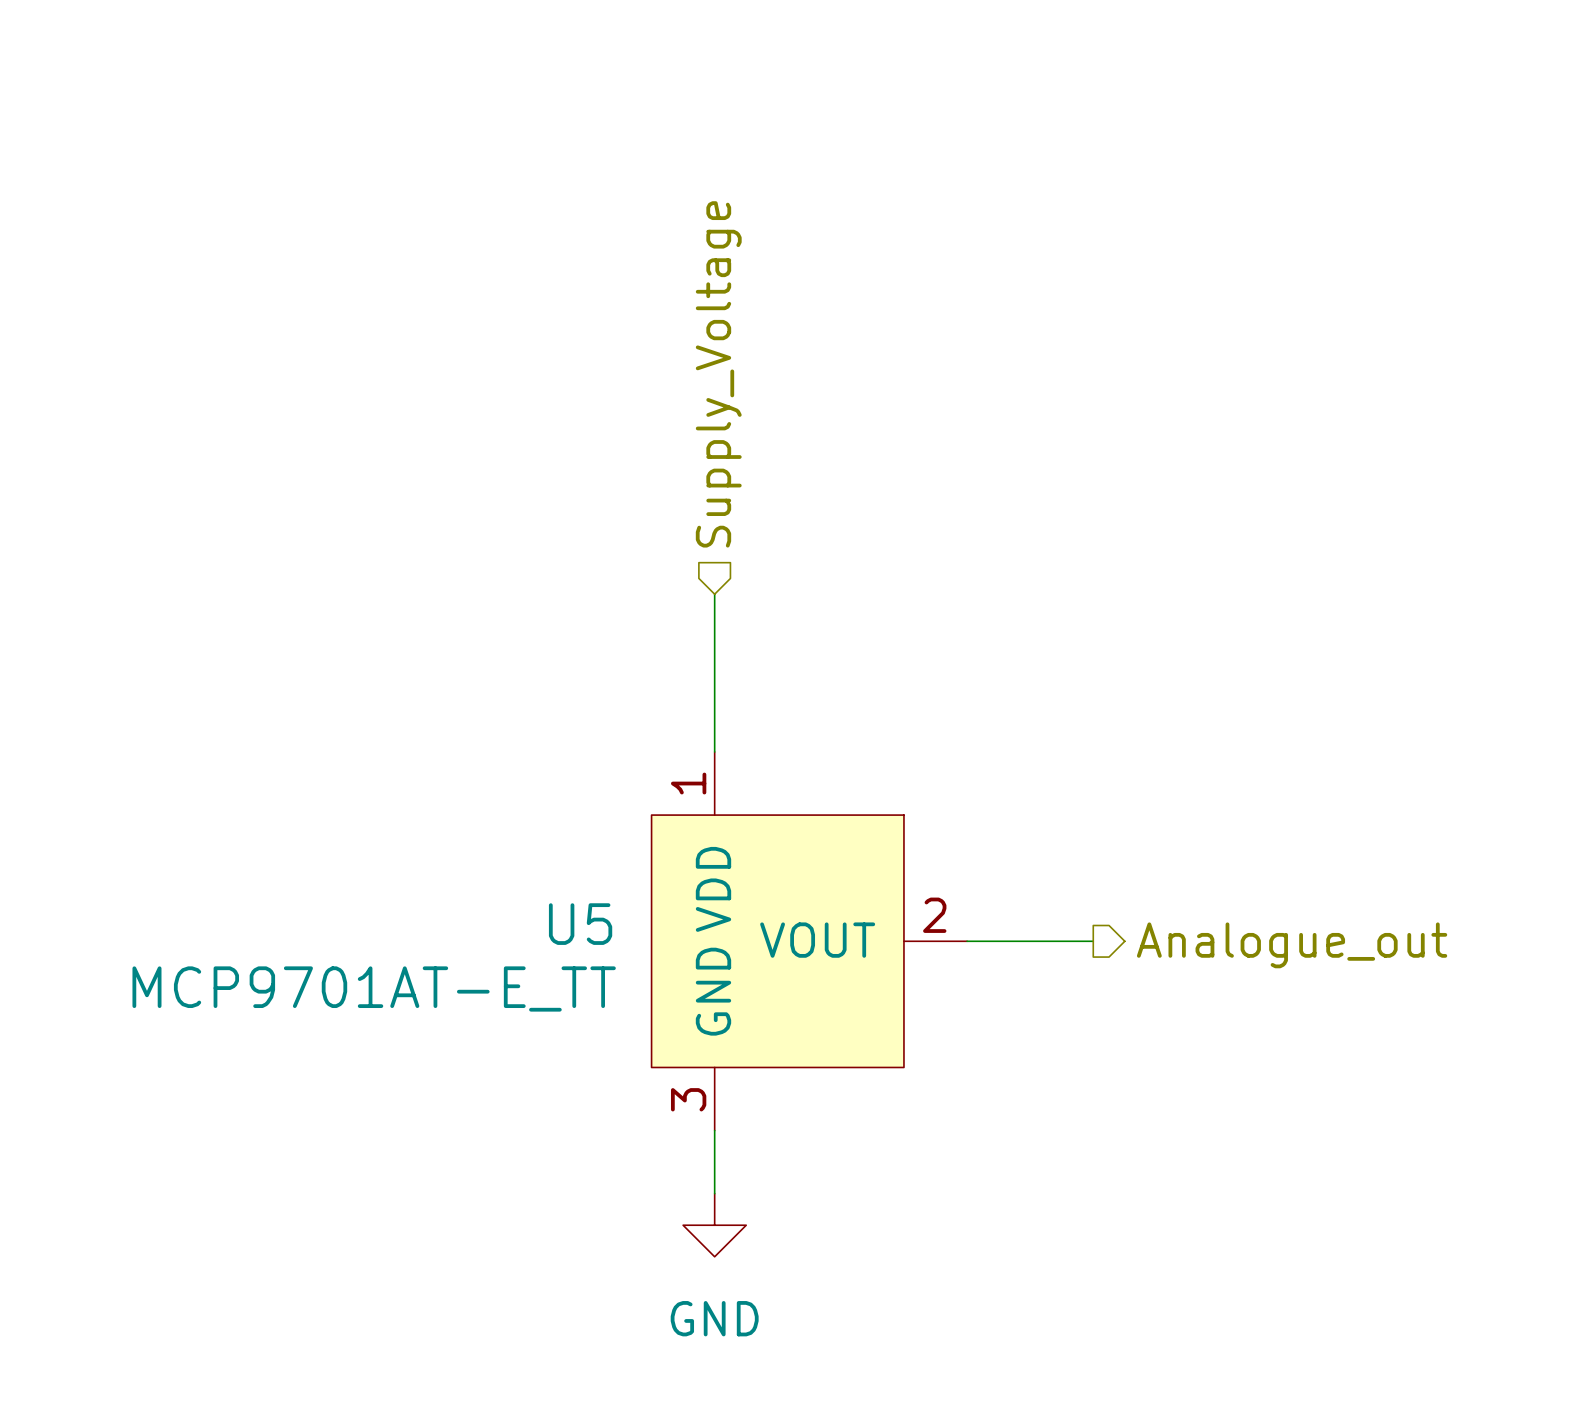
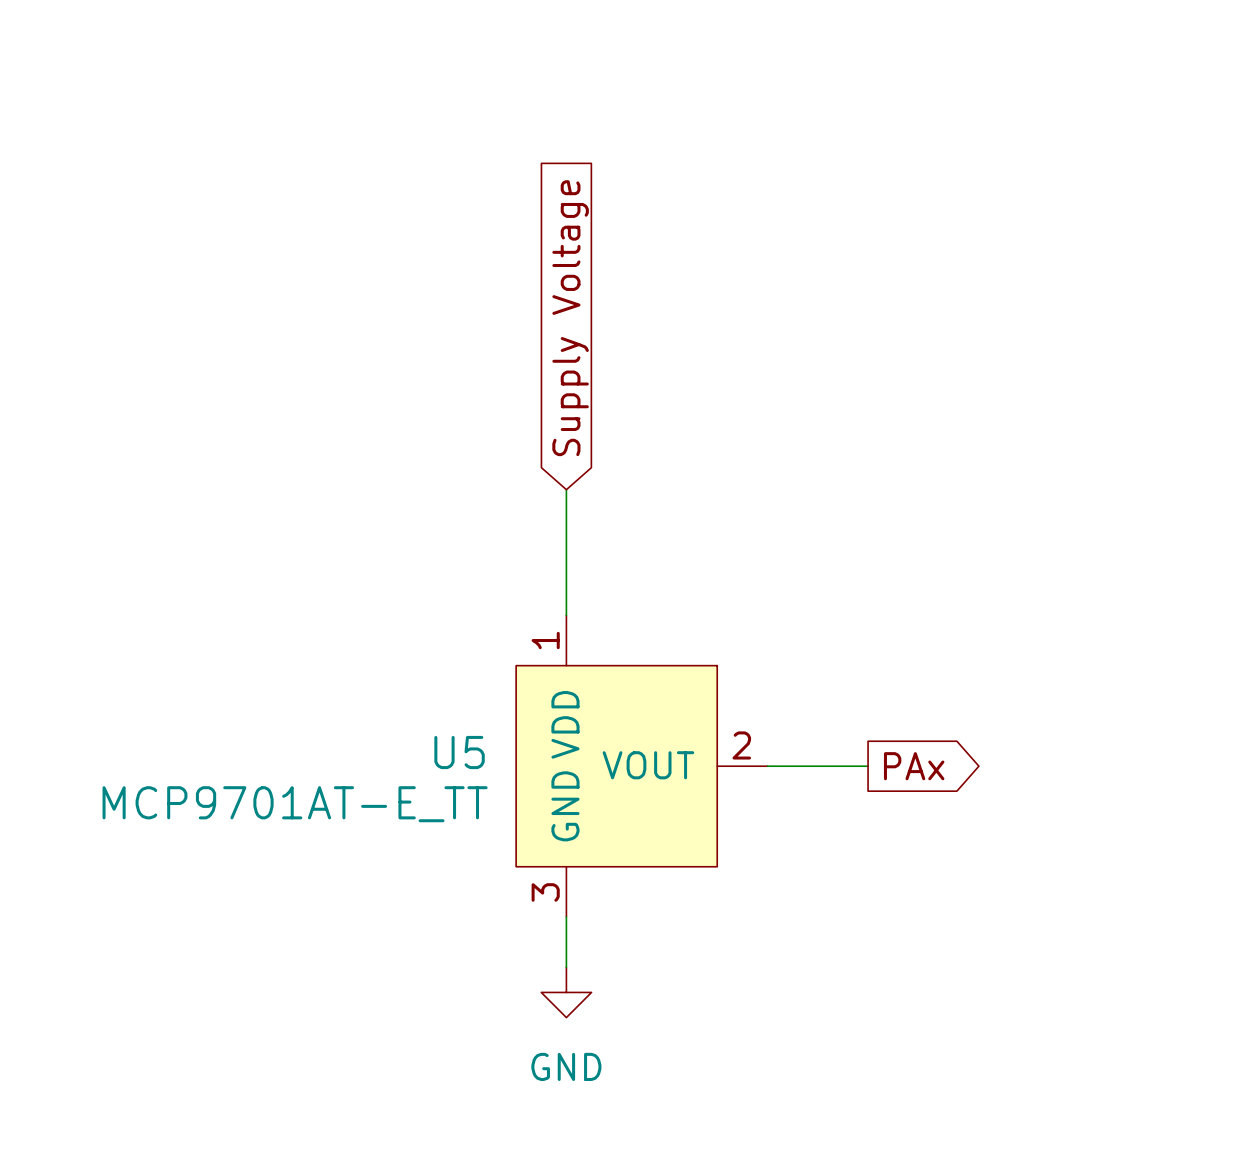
hierarchical label: Supply_Voltage (718, 374) -> none
global label: none -> Supply Voltage (570, 318)
global label: none -> PAx (914, 766)
hierarchical label: Analogue_out (1292, 945) -> none

